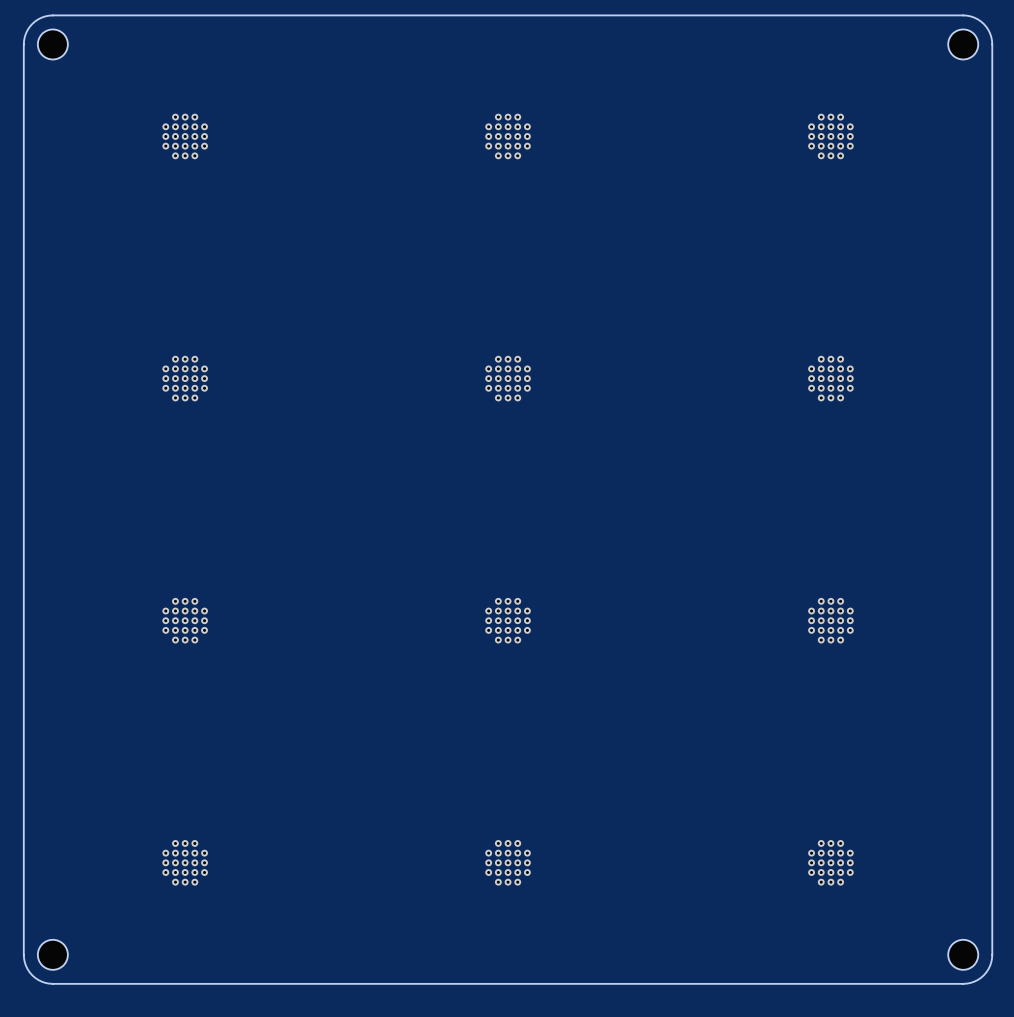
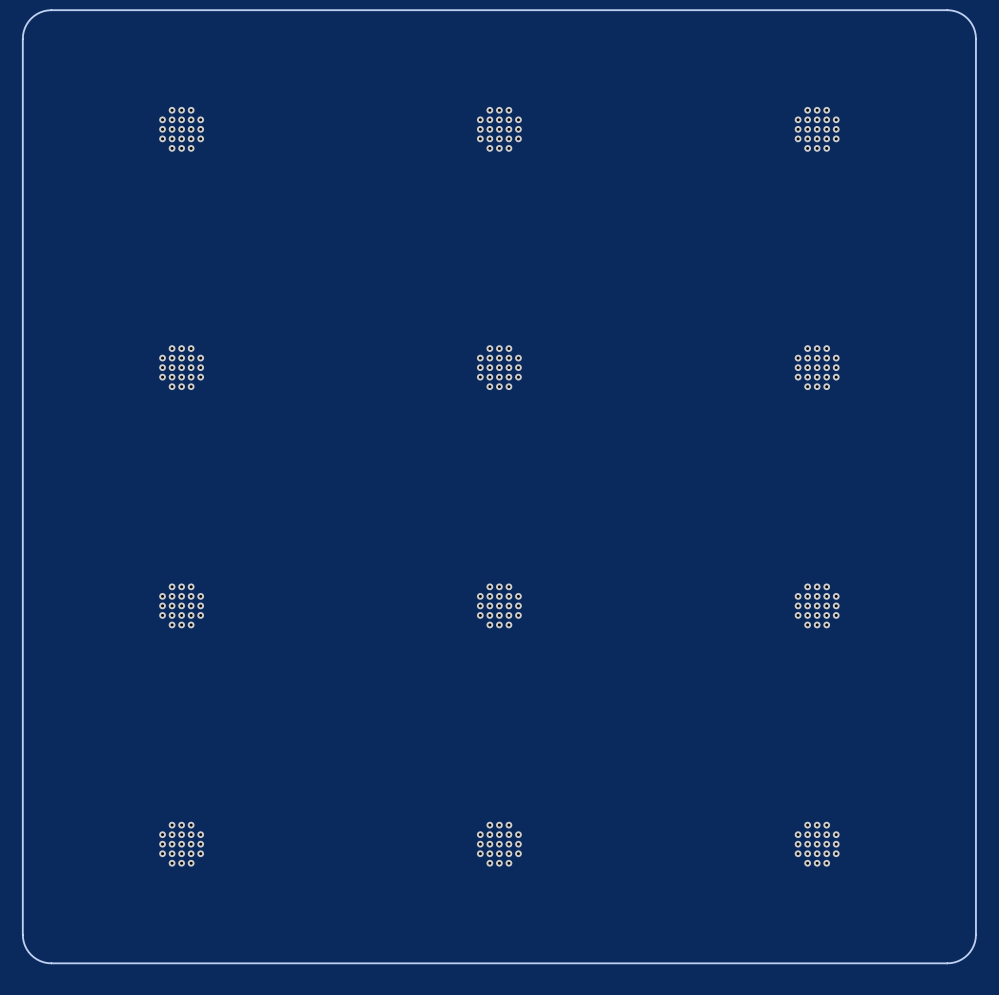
hole: (52, 44) -> none
hole: (963, 44) -> none
hole: (52, 954) -> none
hole: (963, 954) -> none

